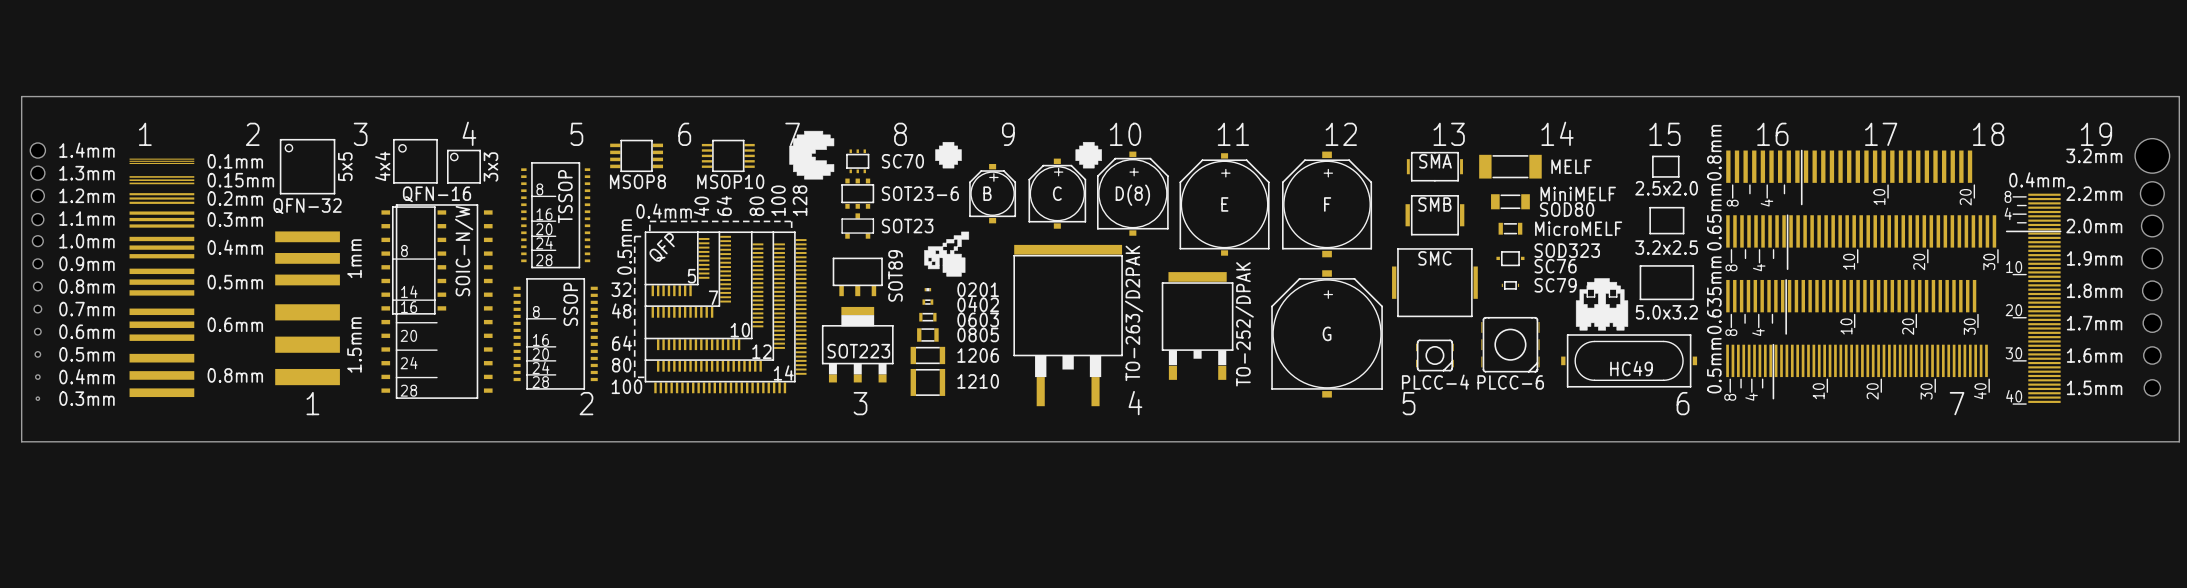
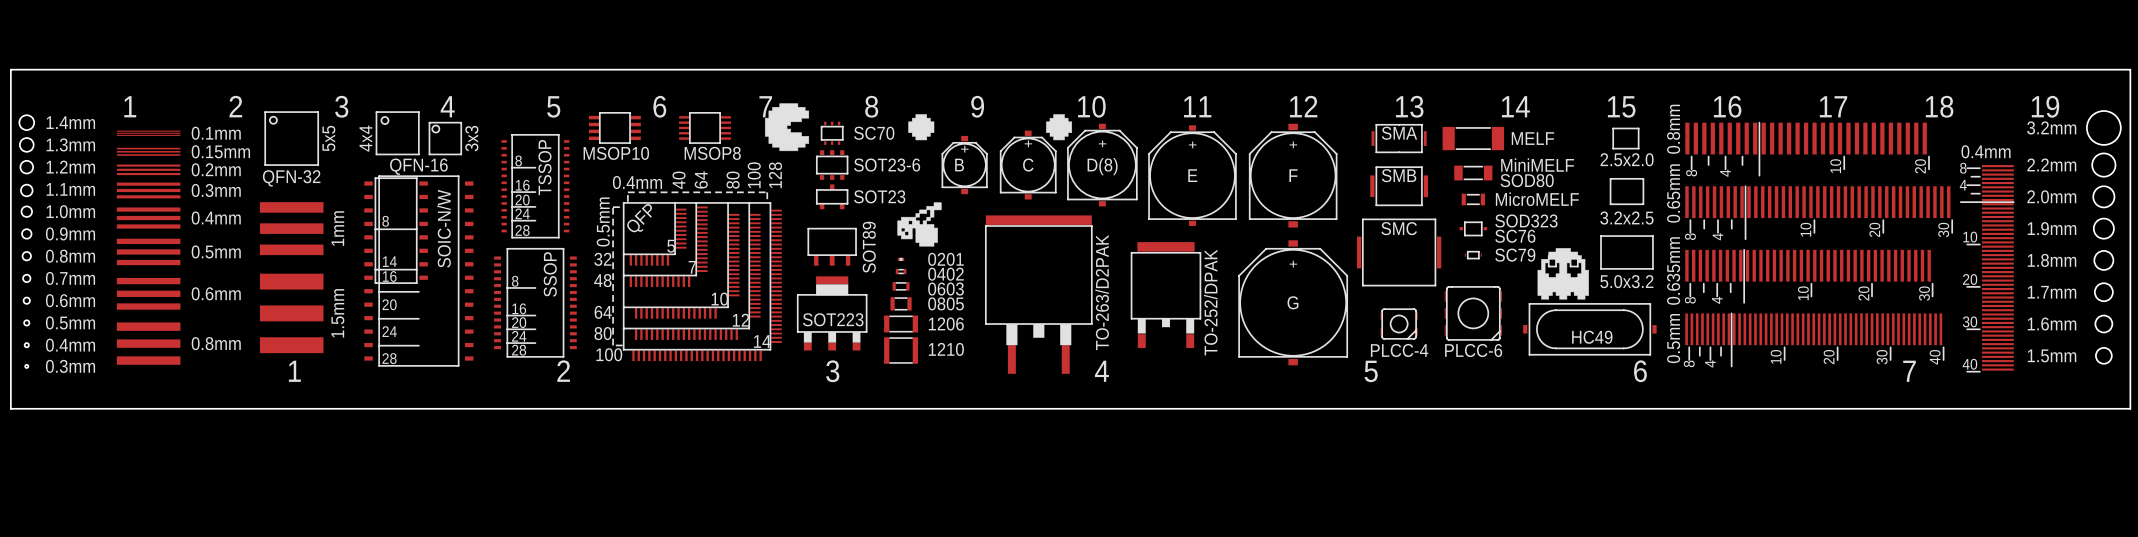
text: MSOP8 (637, 181) -> MSOP10 (616, 153)
text: MSOP10 (730, 181) -> MSOP8 (712, 153)

